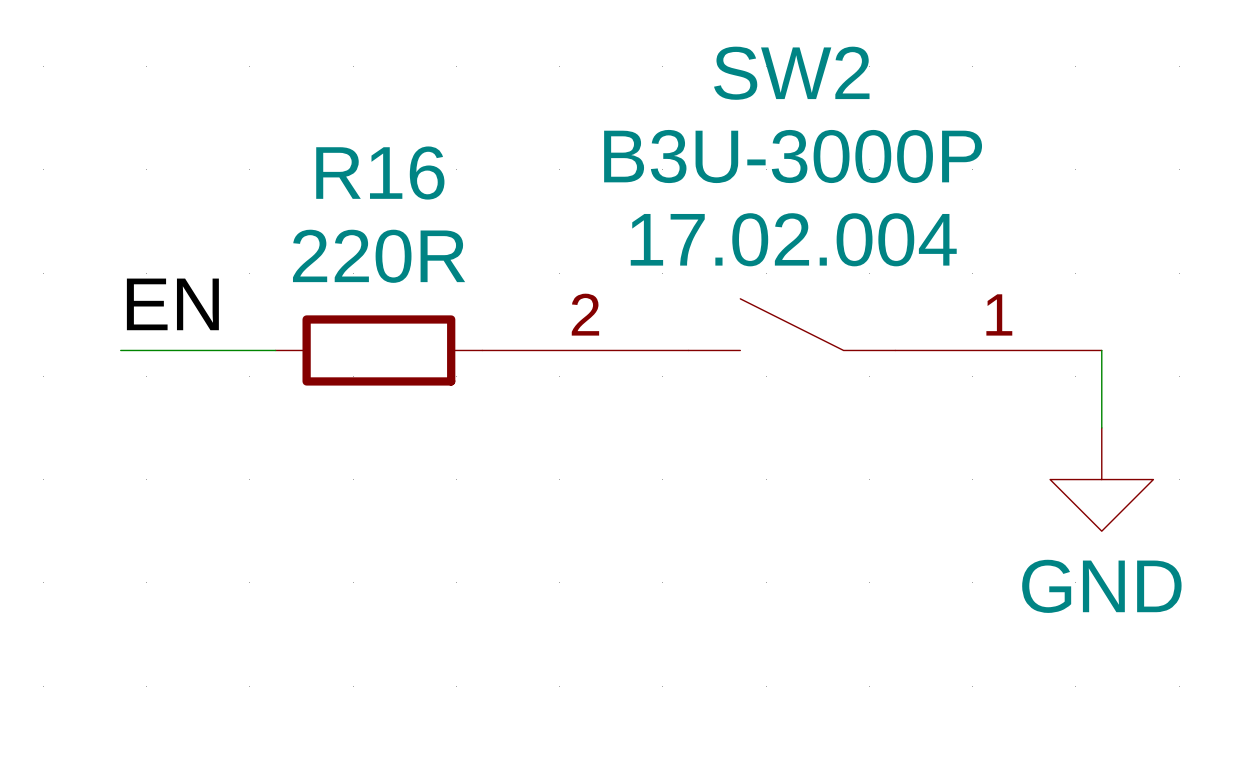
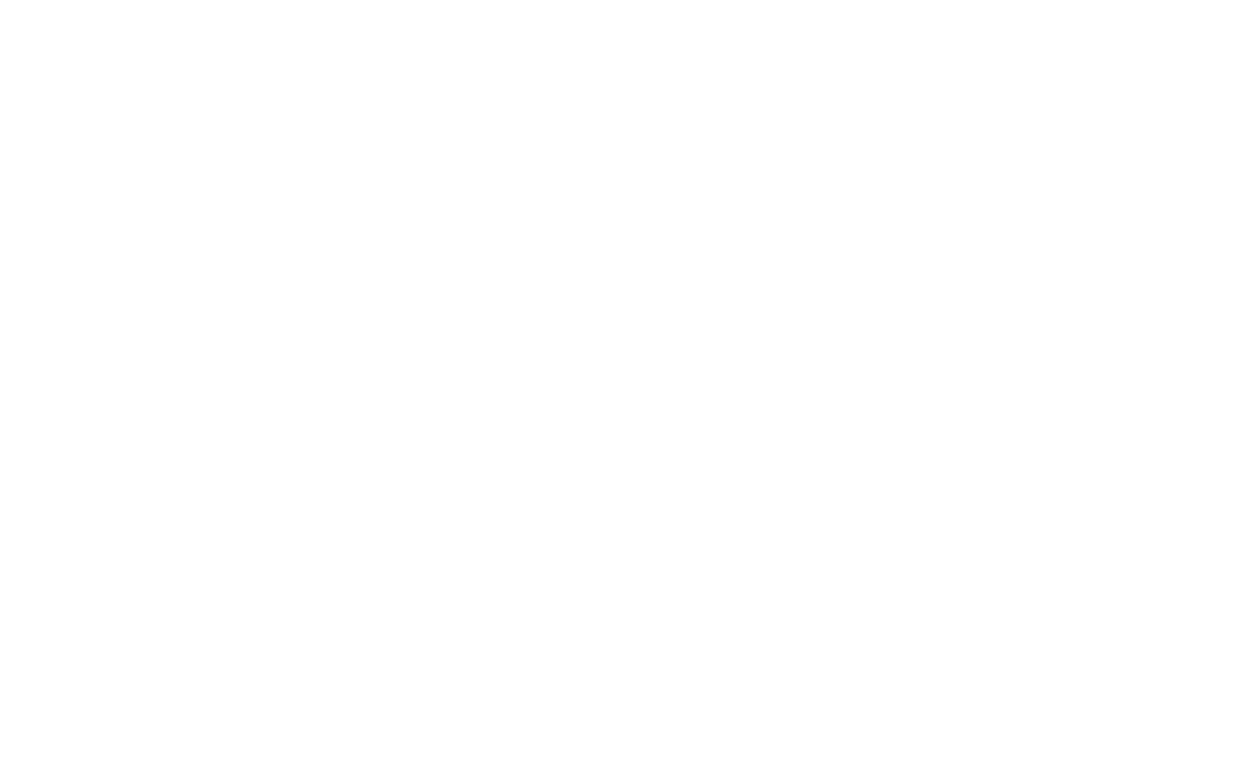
label: EN (172, 304) -> none
SW2: B3U-3000P (791, 324) -> none
wire: (120, 350) (275, 350) -> none
R16: 220R (378, 350) -> none
wire: (1101, 350) (1101, 427) -> none
power symbol: GND (1101, 479) -> none

